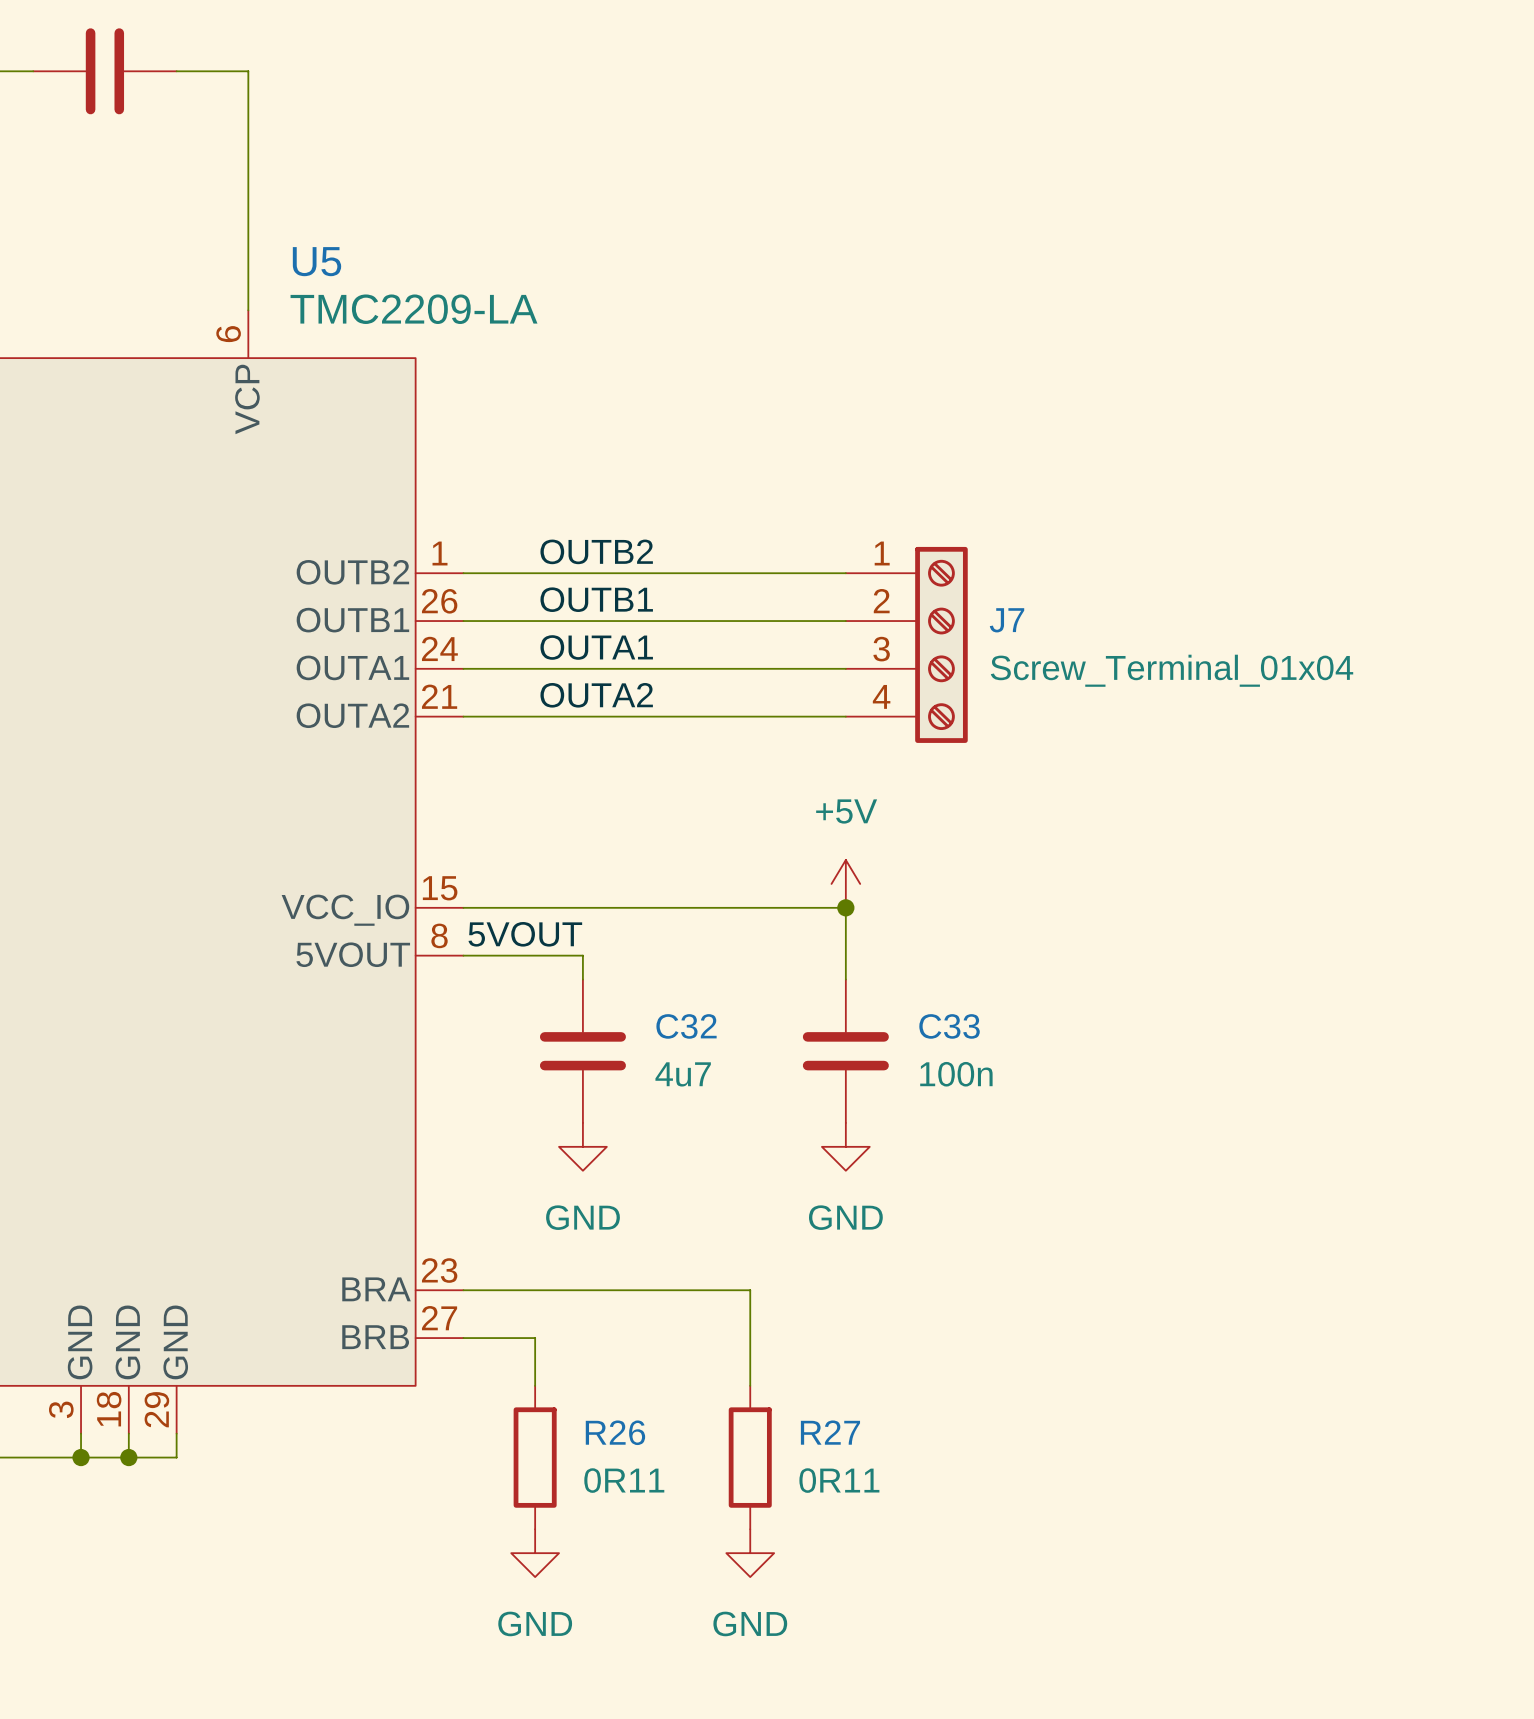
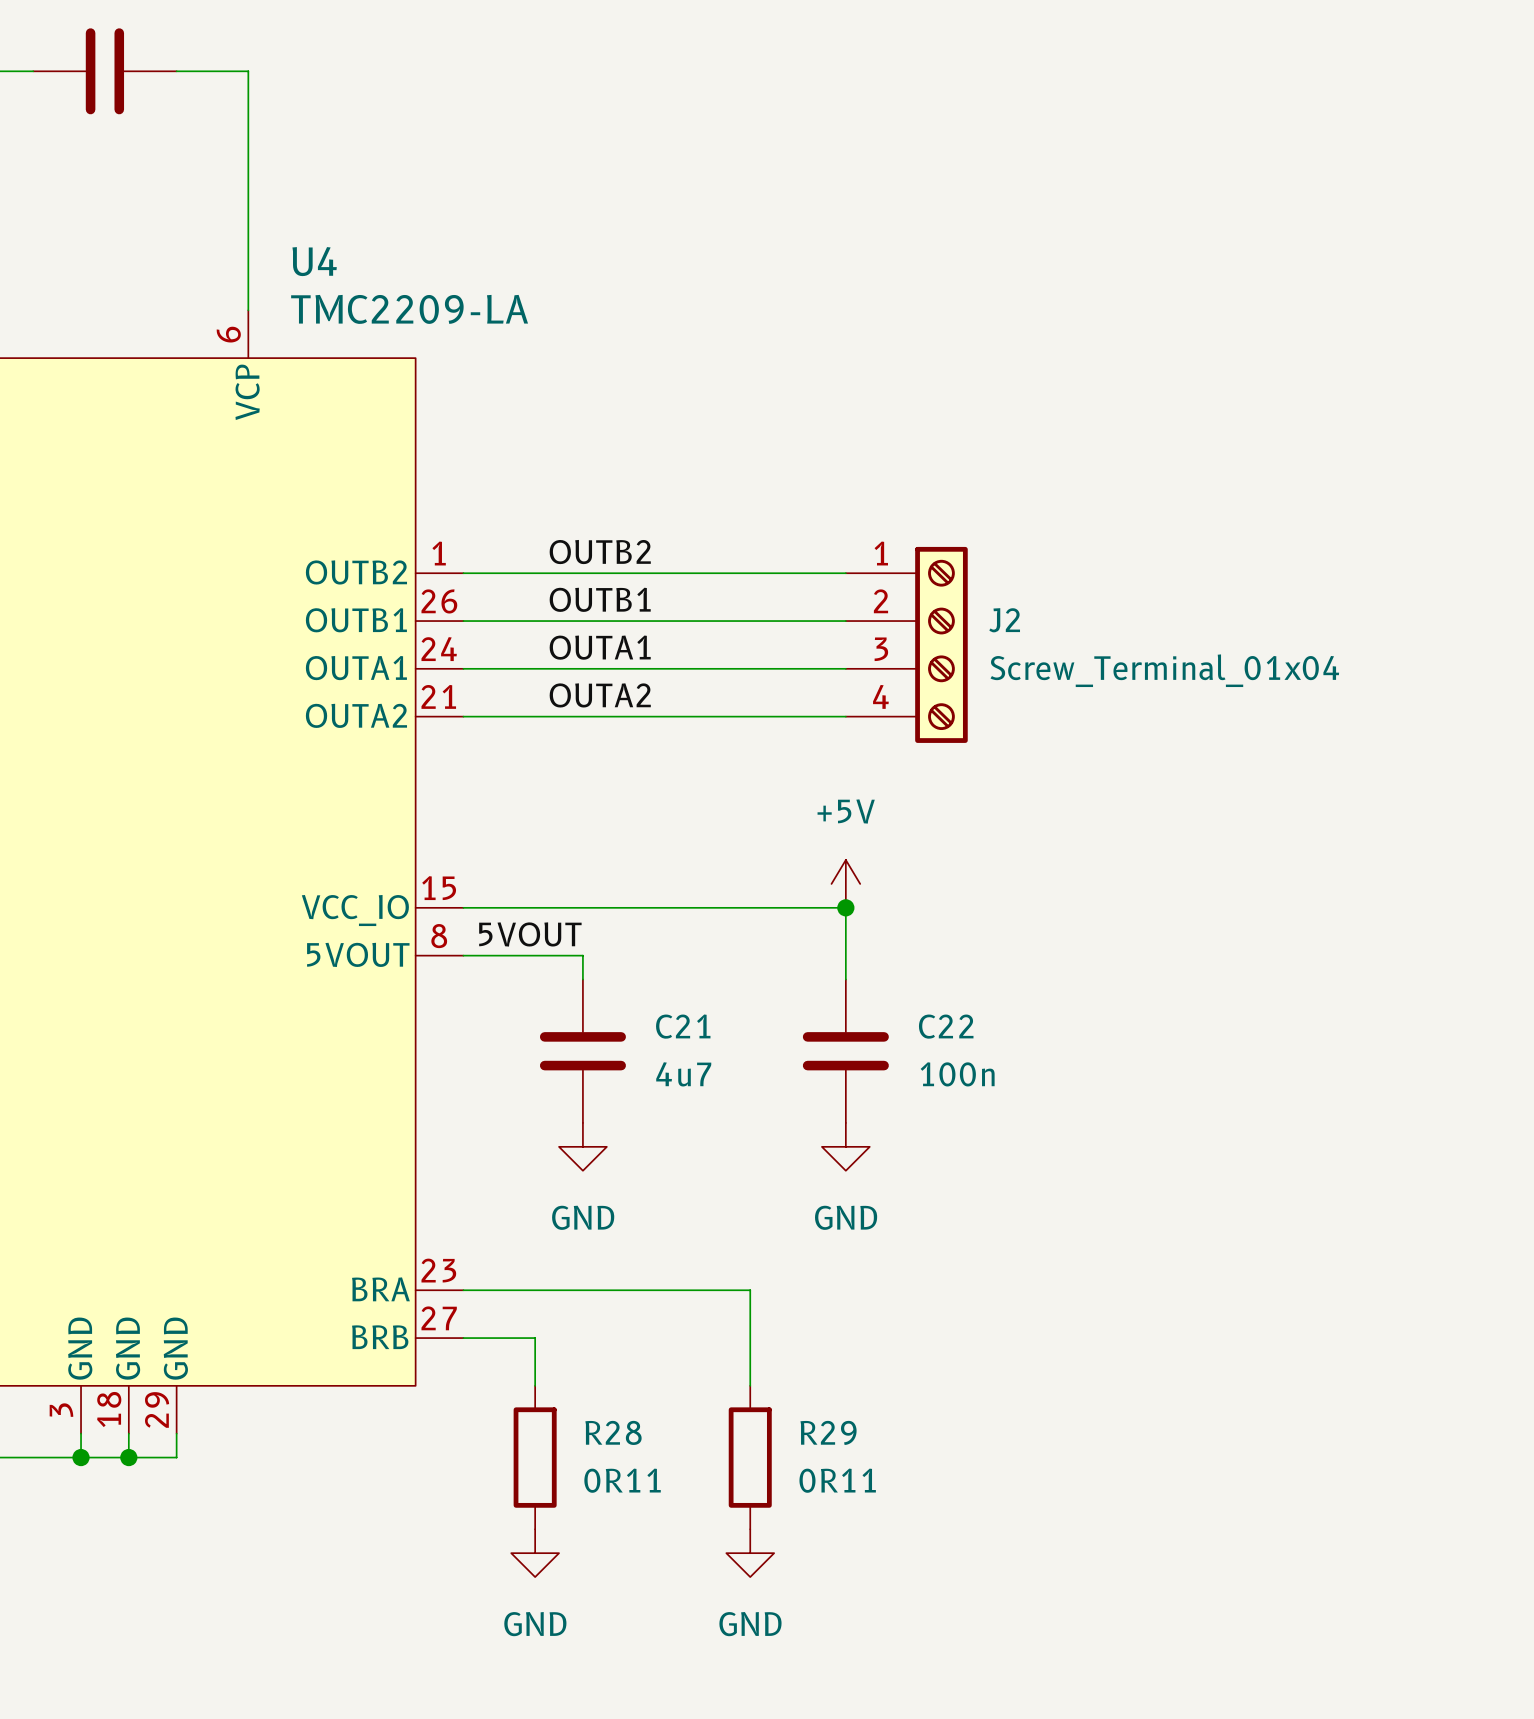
U5 name: U5 (317, 261) -> U4 (314, 261)
J7 name: J7 (1007, 620) -> J2 (1004, 620)
C32 name: C32 (686, 1026) -> C21 (683, 1026)
C33 name: C33 (949, 1026) -> C22 (946, 1026)
R26 name: R26 (615, 1432) -> R28 (613, 1432)
R27 name: R27 (830, 1432) -> R29 (828, 1432)

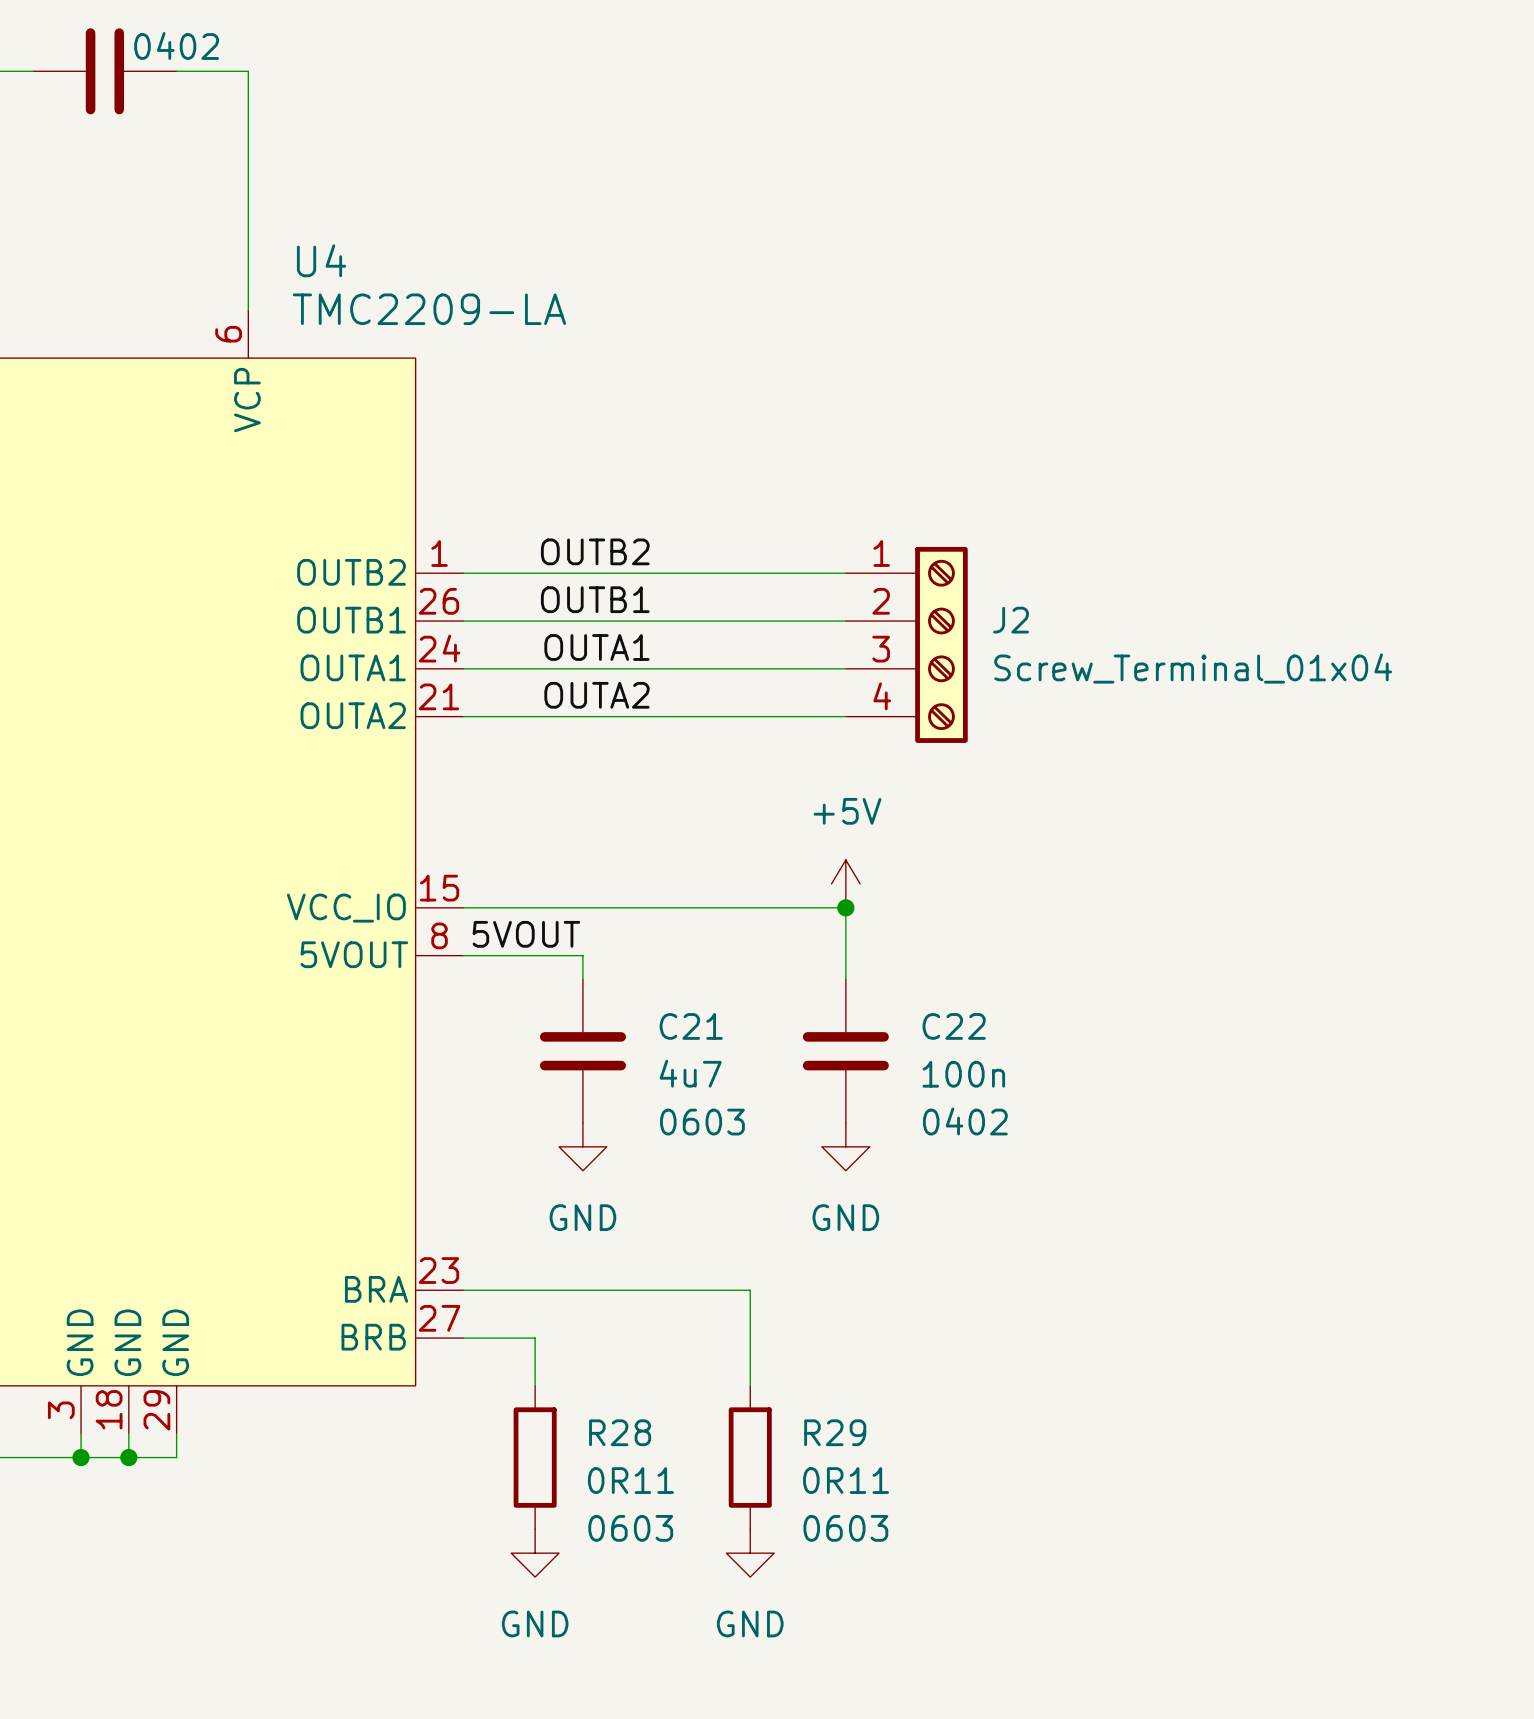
part text: none -> 0402 (176, 45)
C21 text: none -> 0603 (702, 1122)
C22 text: none -> 0402 (965, 1121)
R28 text: none -> 0603 (630, 1528)
R29 text: none -> 0603 (845, 1528)

